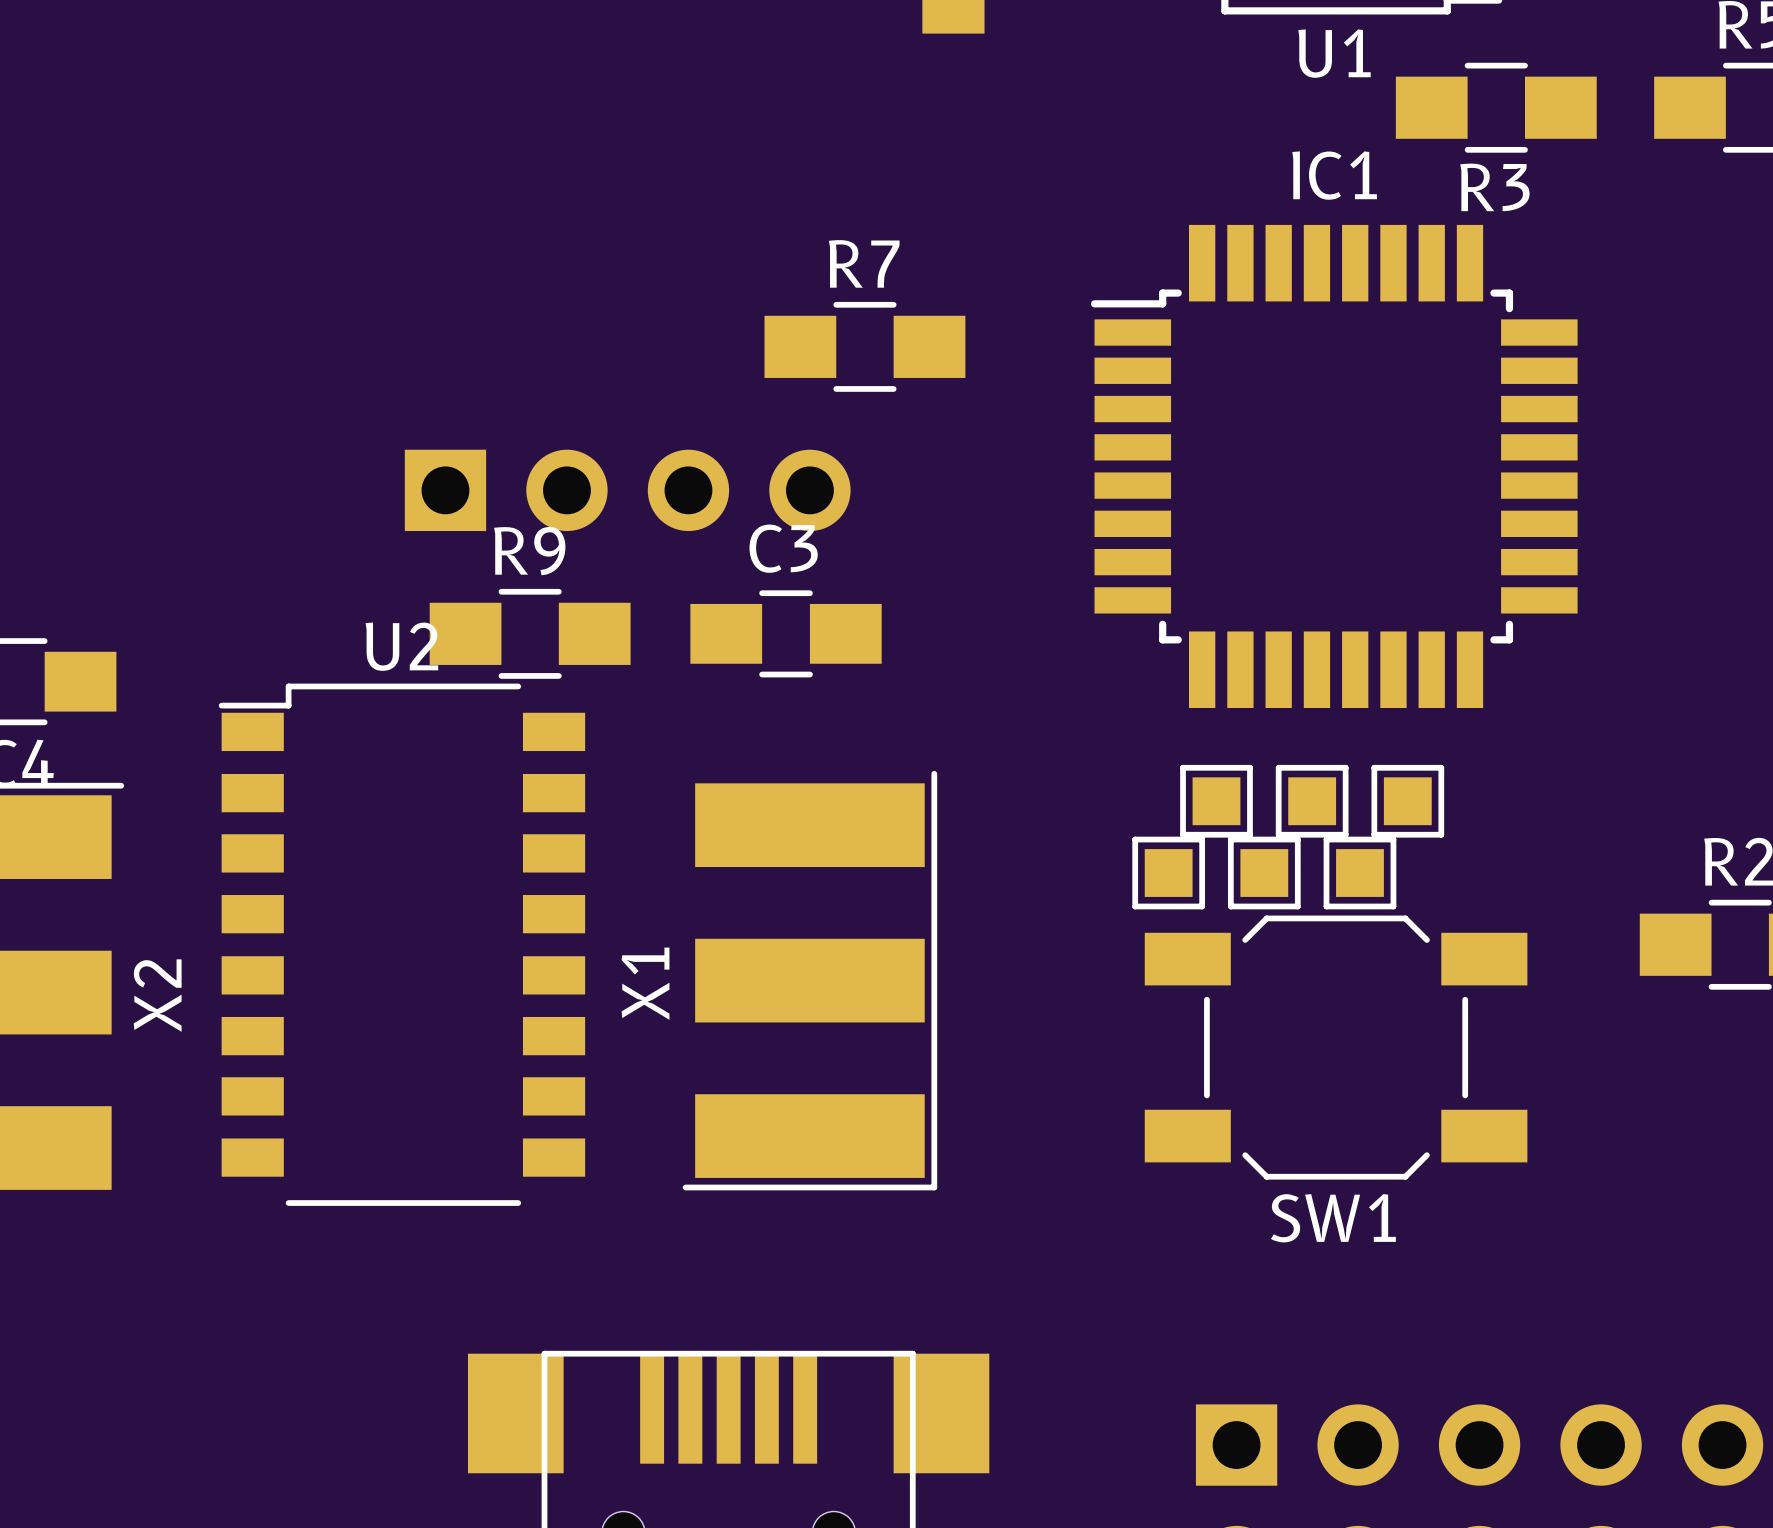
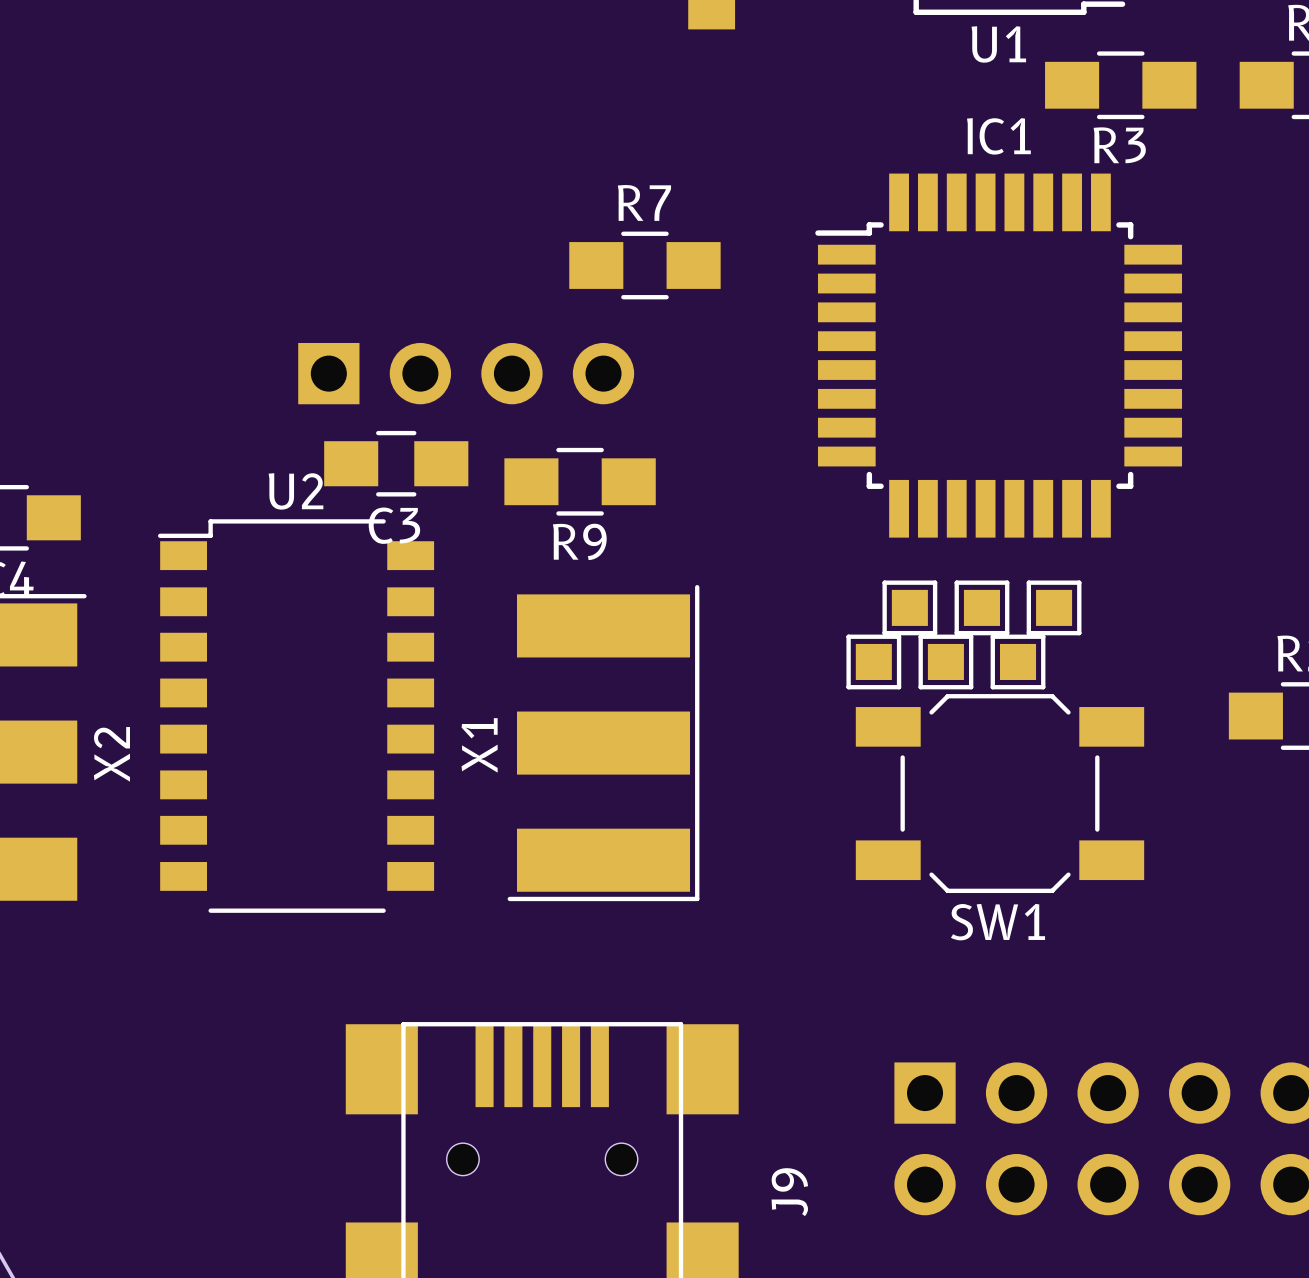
C3 name position: C3 (783, 548) -> C3 (394, 525)
R9 name position: R9 (529, 551) -> R9 (579, 541)
R9 position: (530, 633) -> (580, 481)
C3 position: (786, 633) -> (396, 463)

